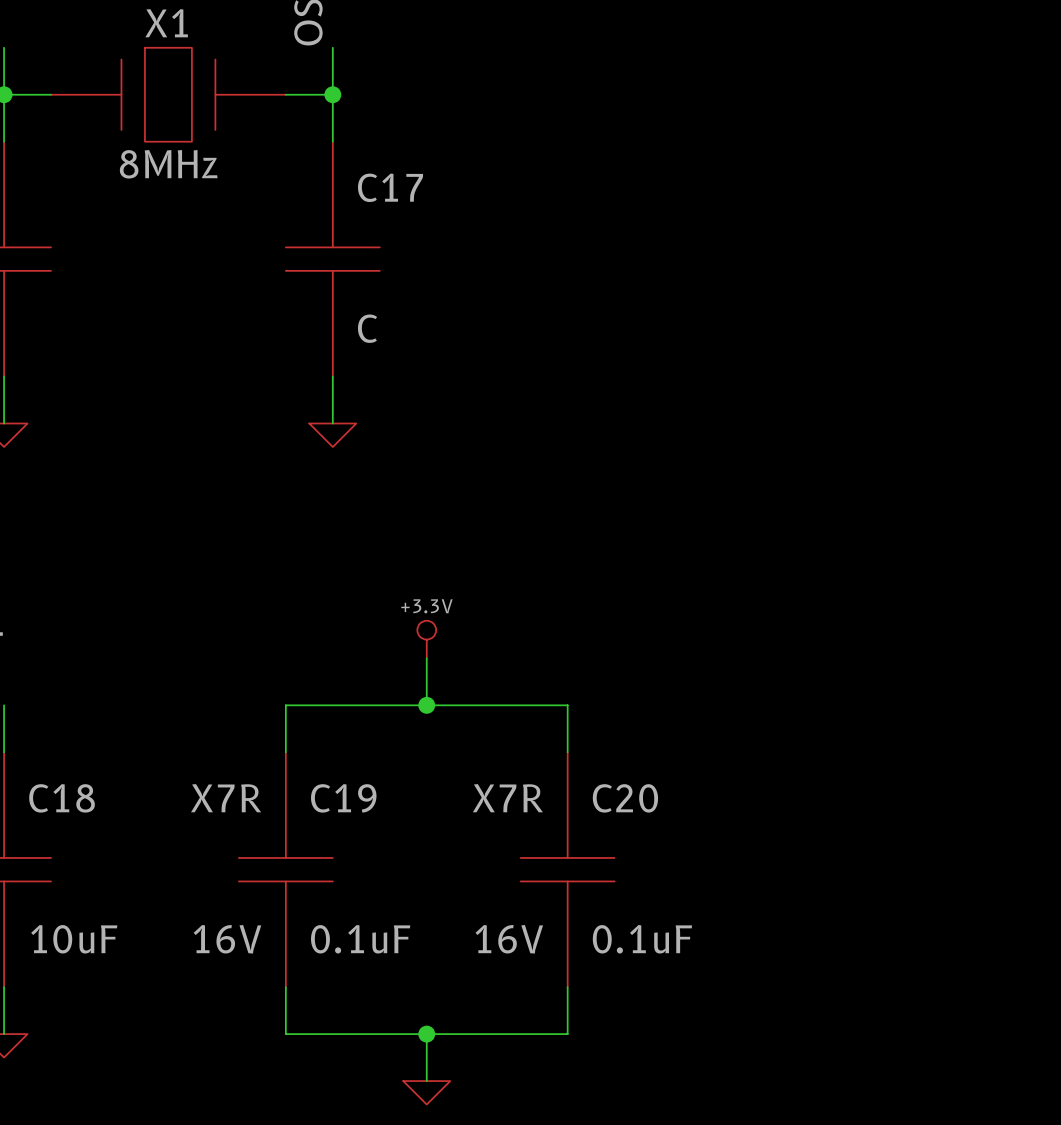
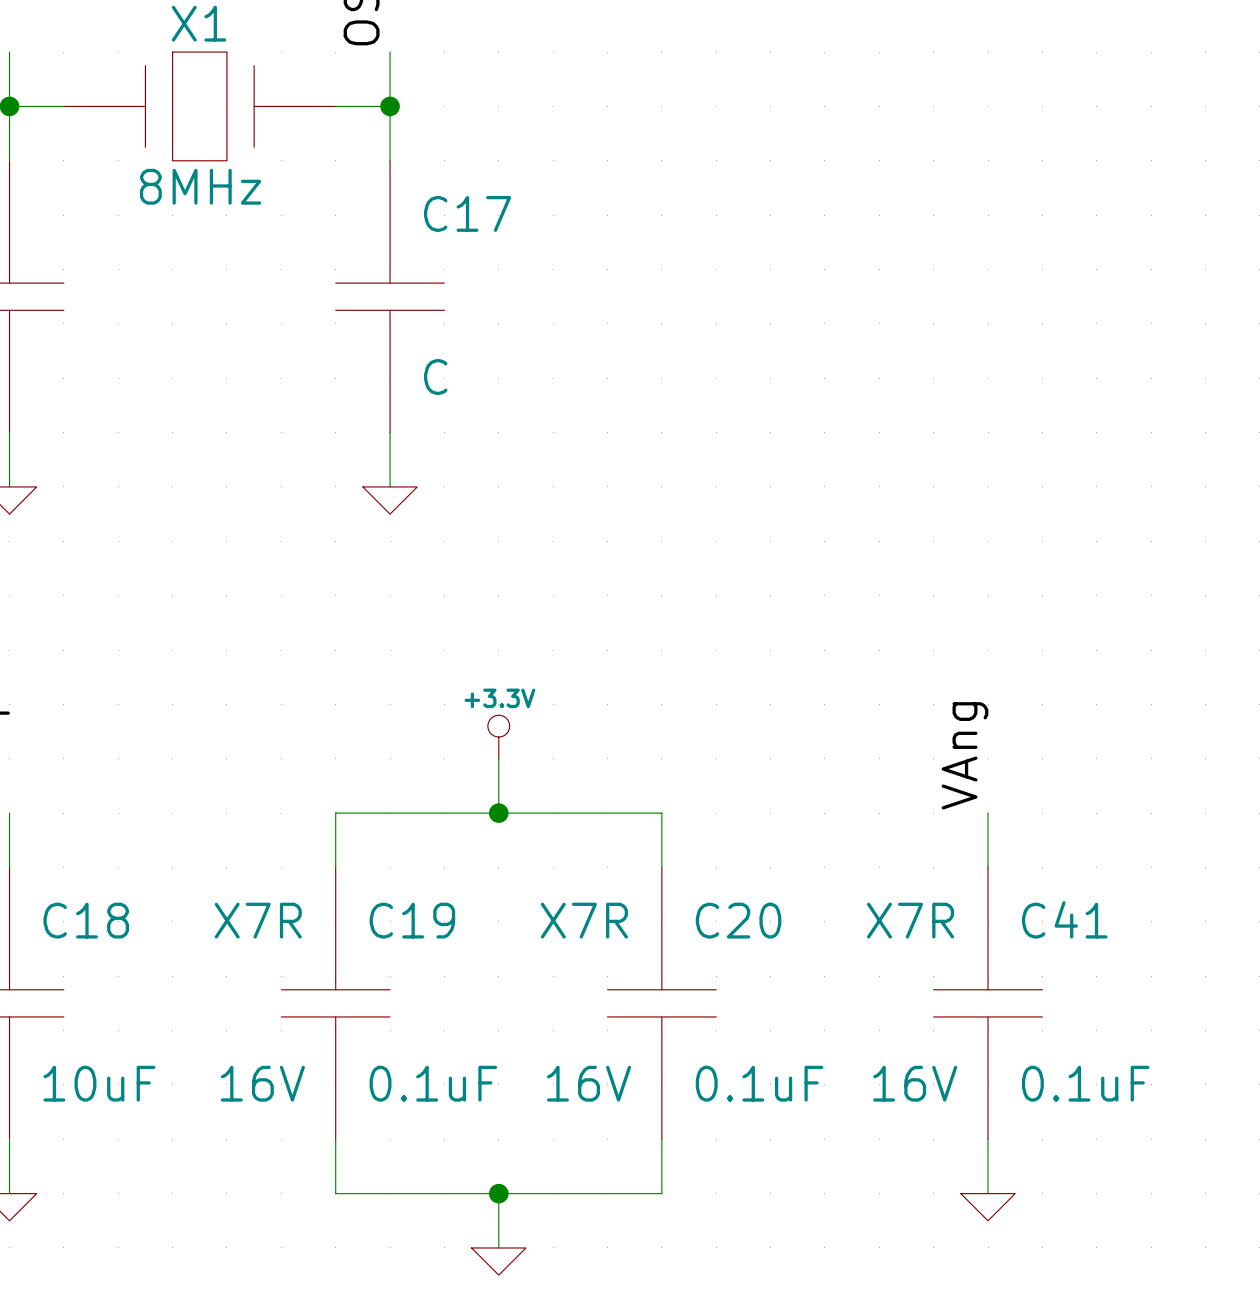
label: none -> VAng (964, 755)
wire: none -> (988, 813) (988, 867)
C41: none -> 0.1uF (988, 1003)
wire: none -> (988, 1139) (988, 1193)
power symbol: none -> (988, 1207)

